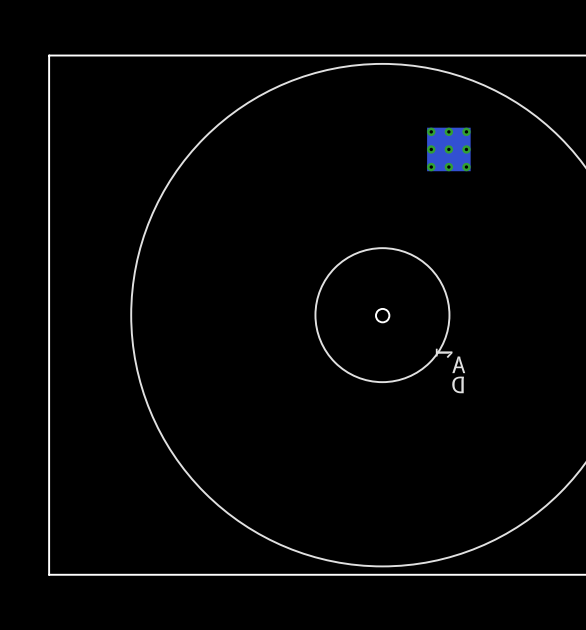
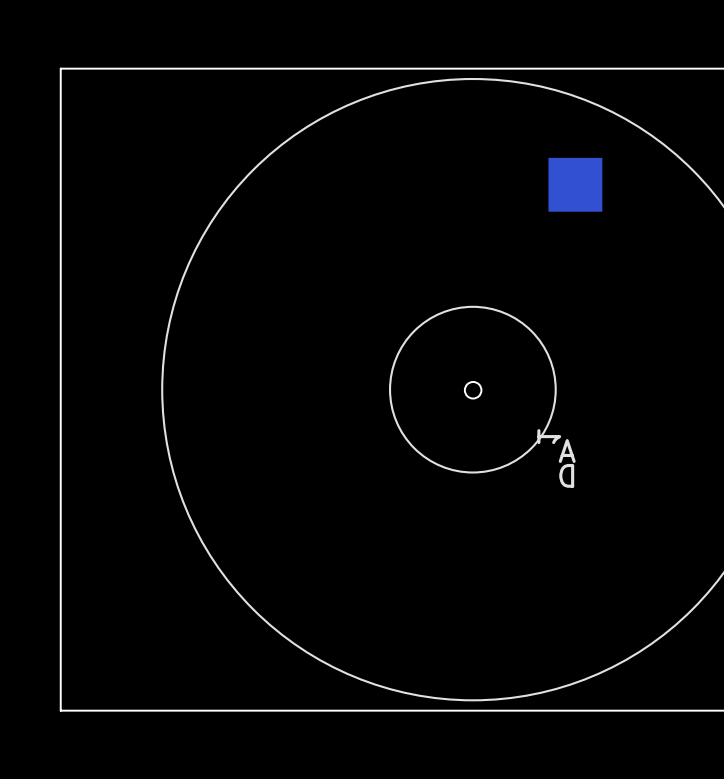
part footprint: [427, 127, 471, 172] -> [548, 157, 603, 212]

